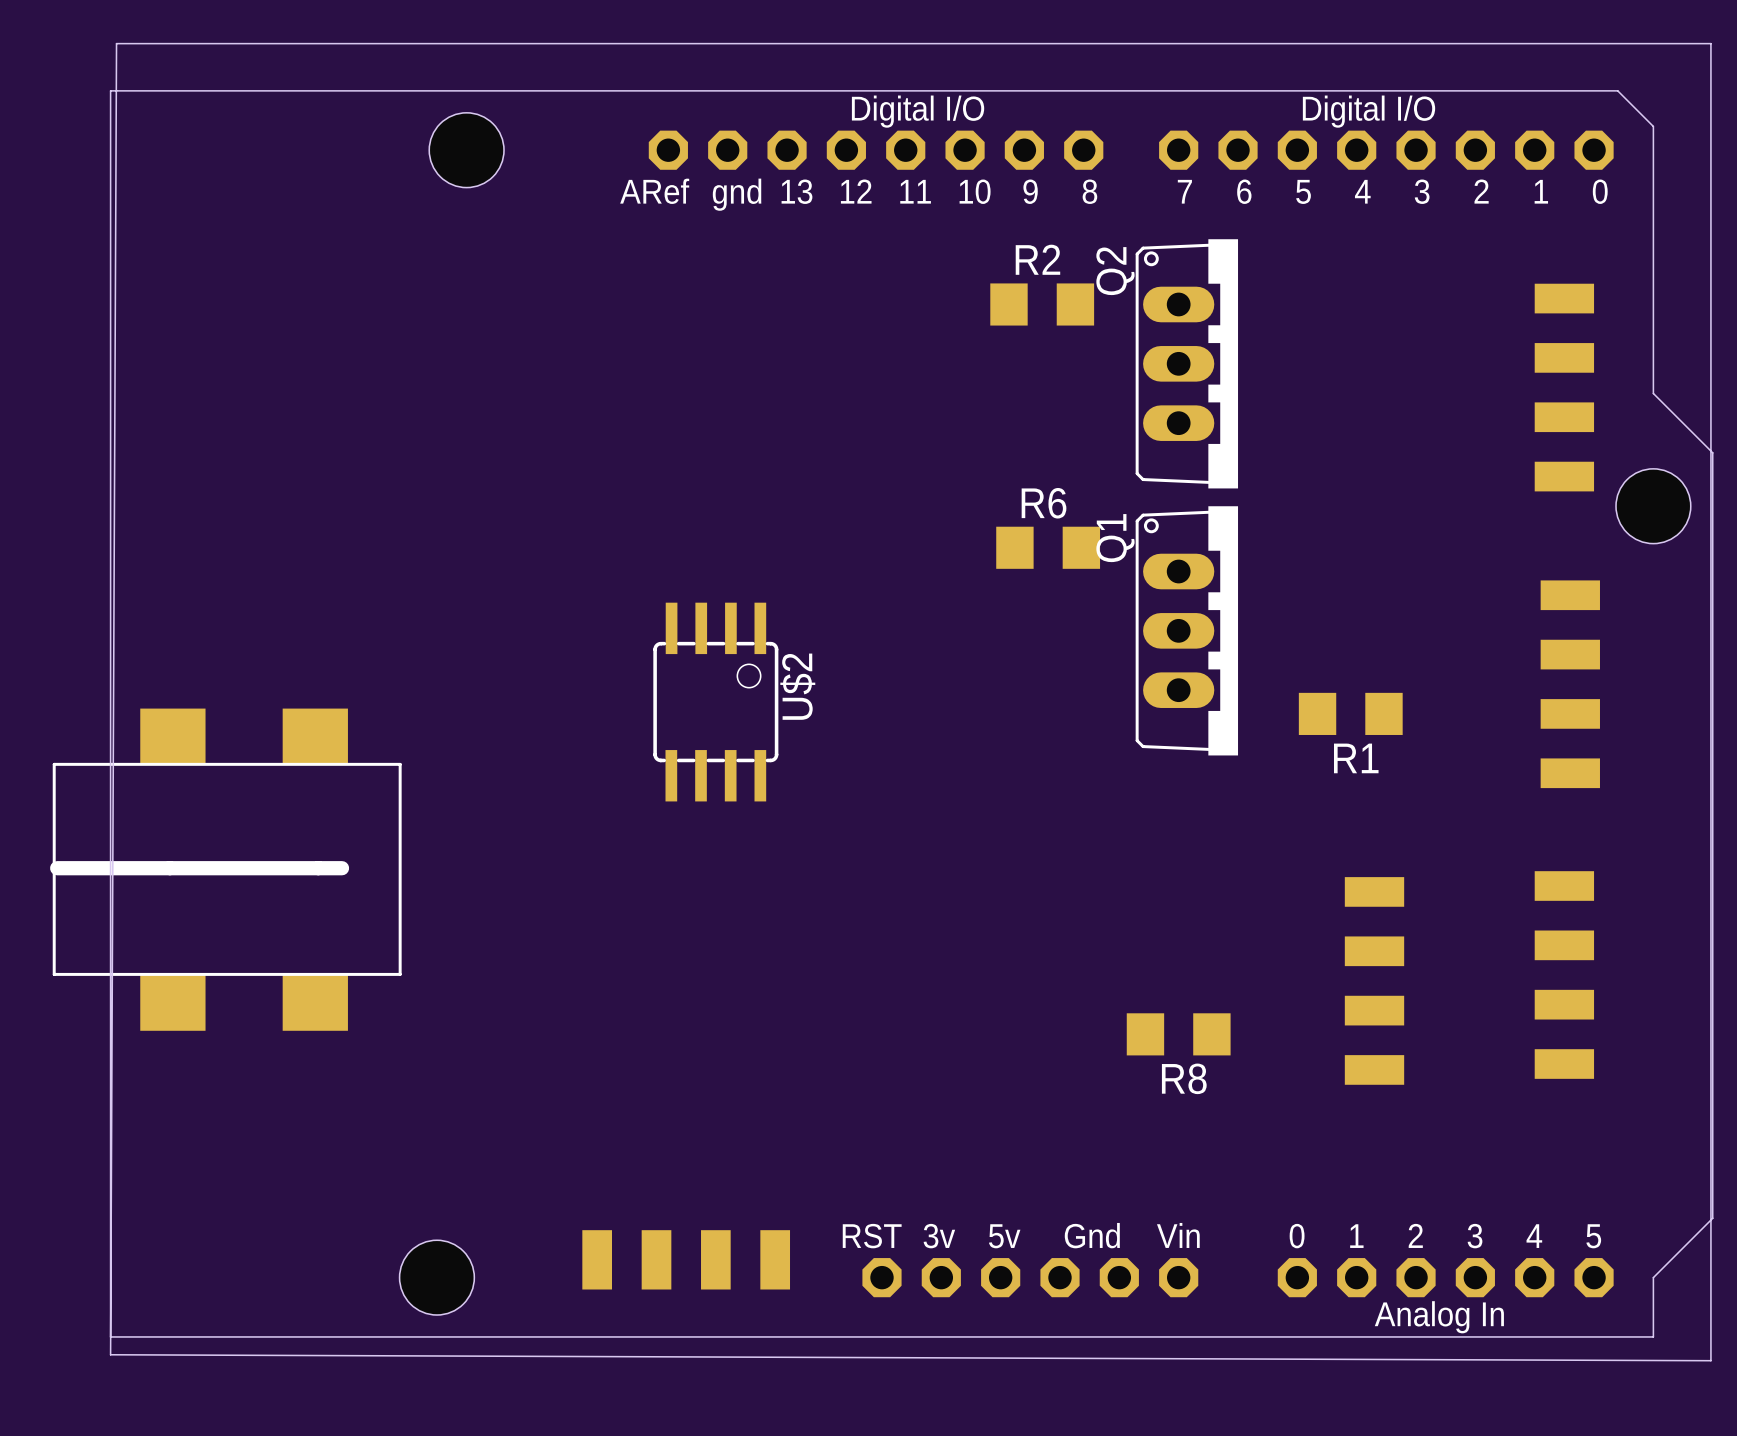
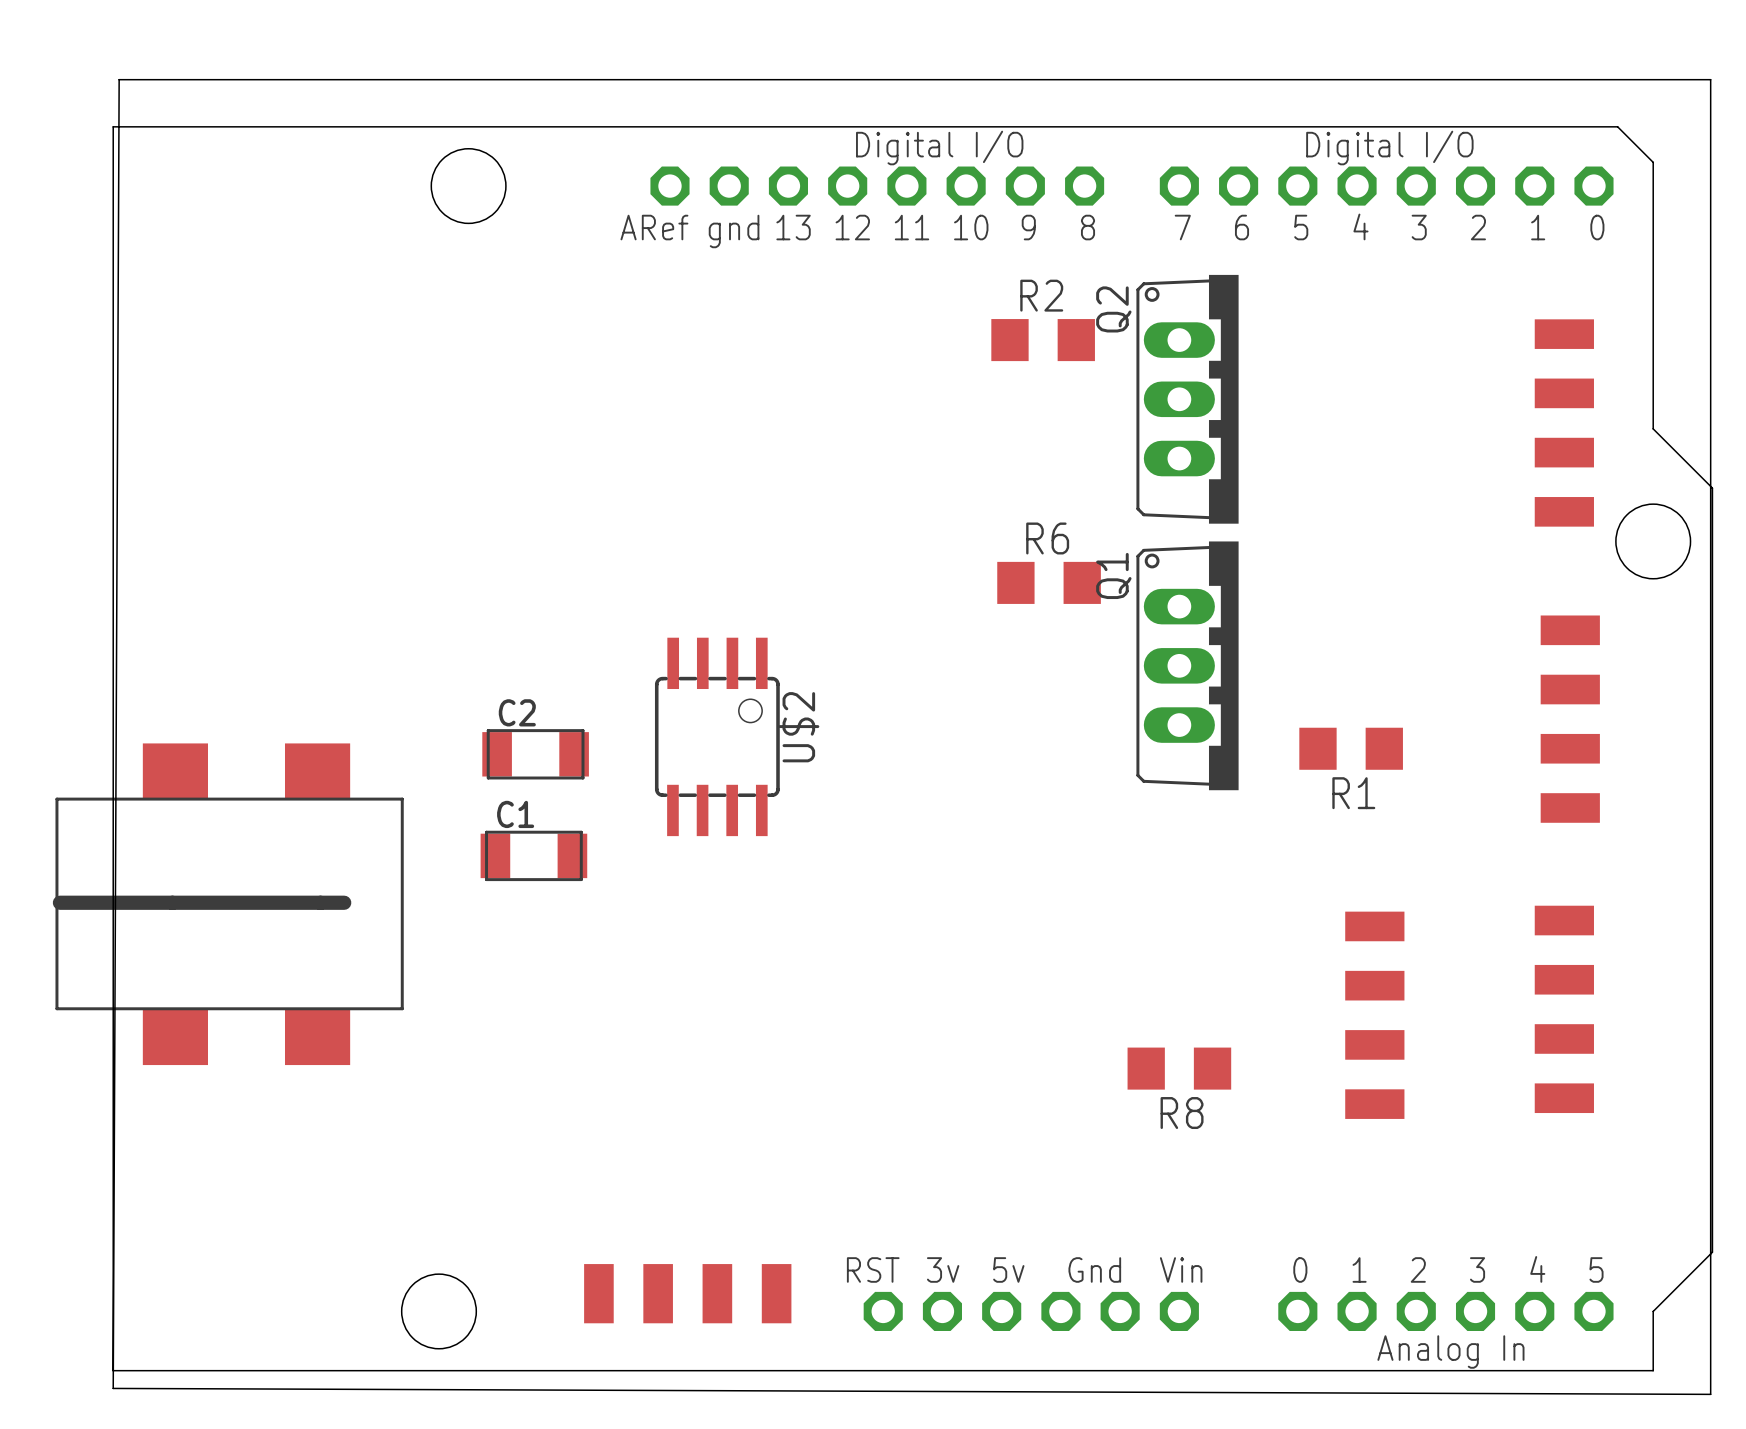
C2: none -> (535, 754)
C1: none -> (533, 855)

